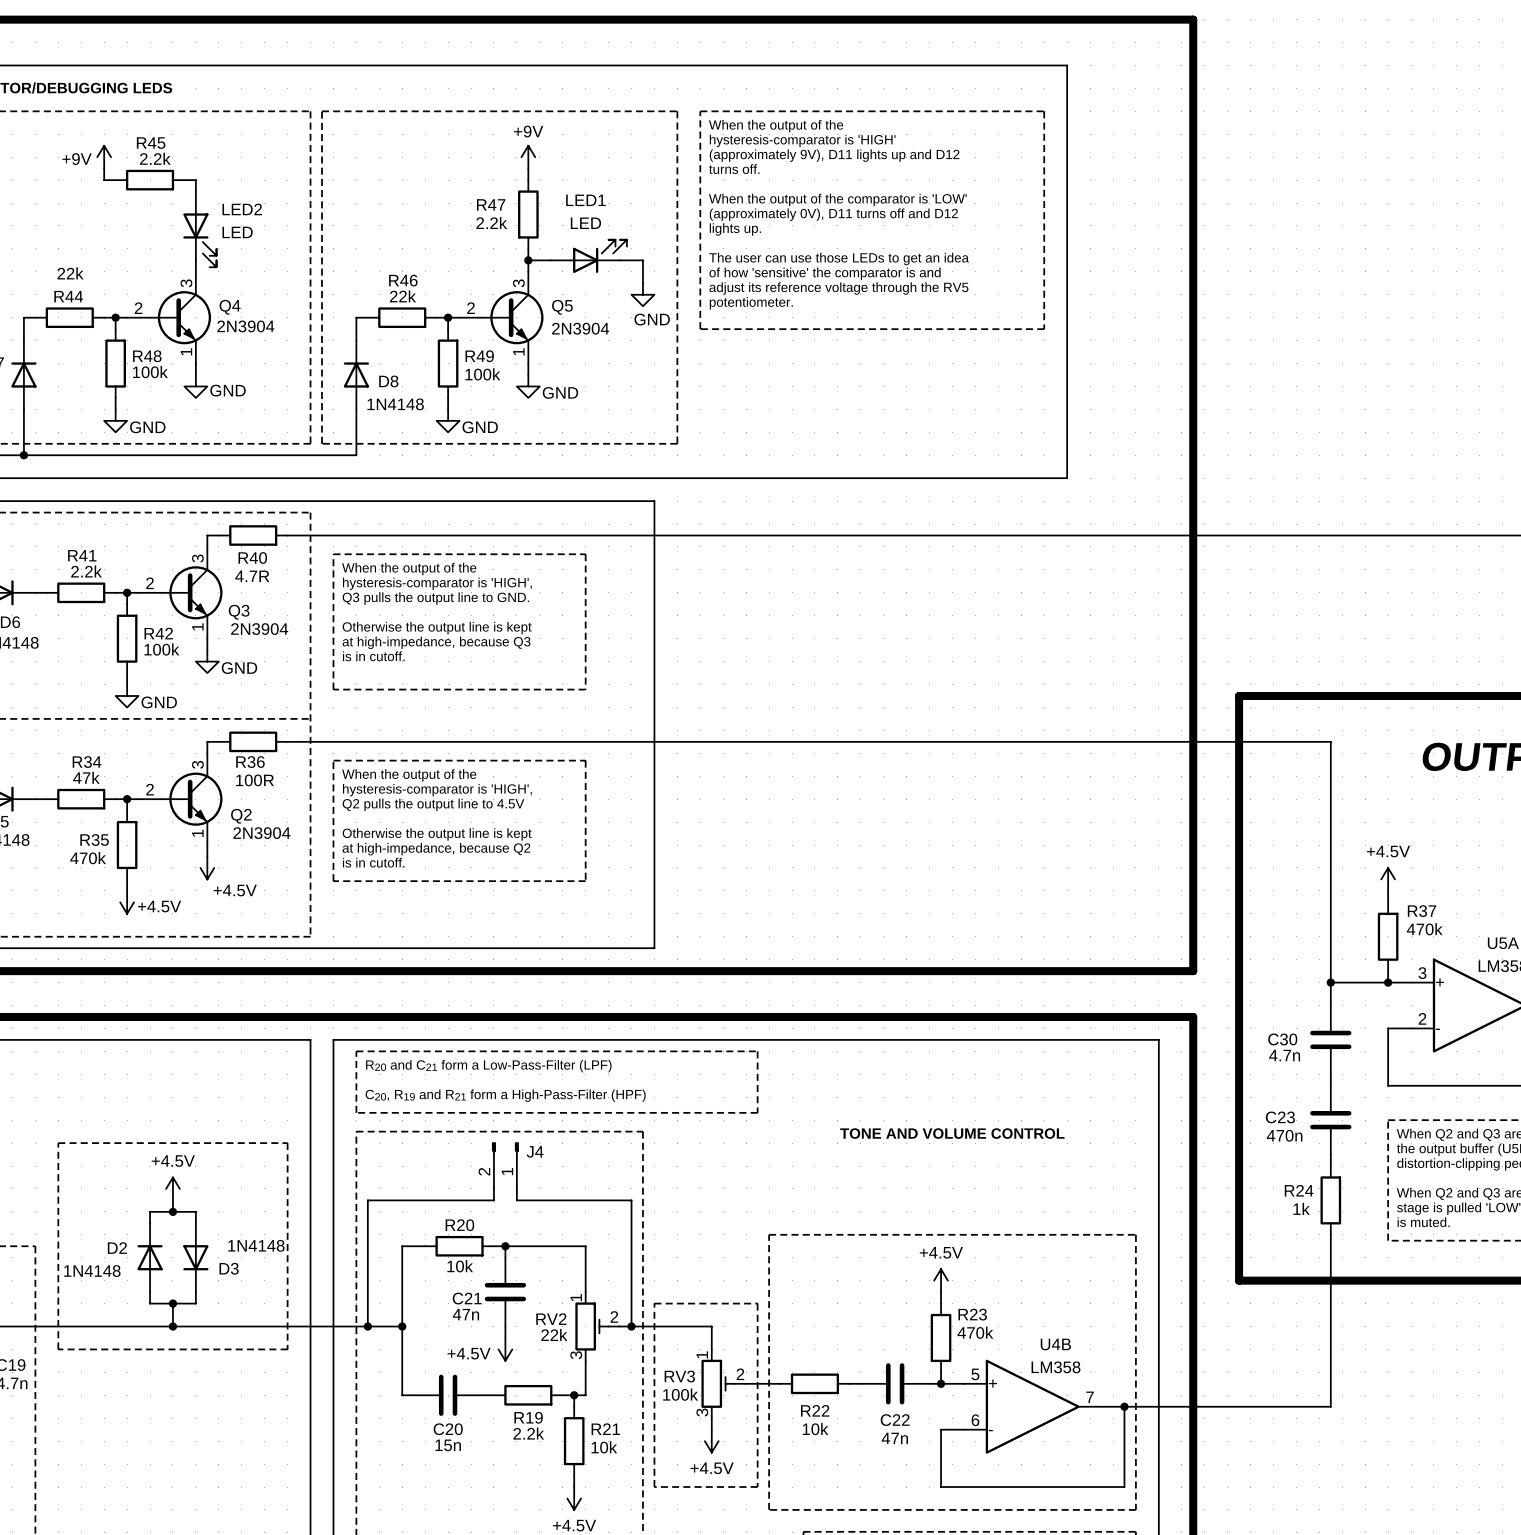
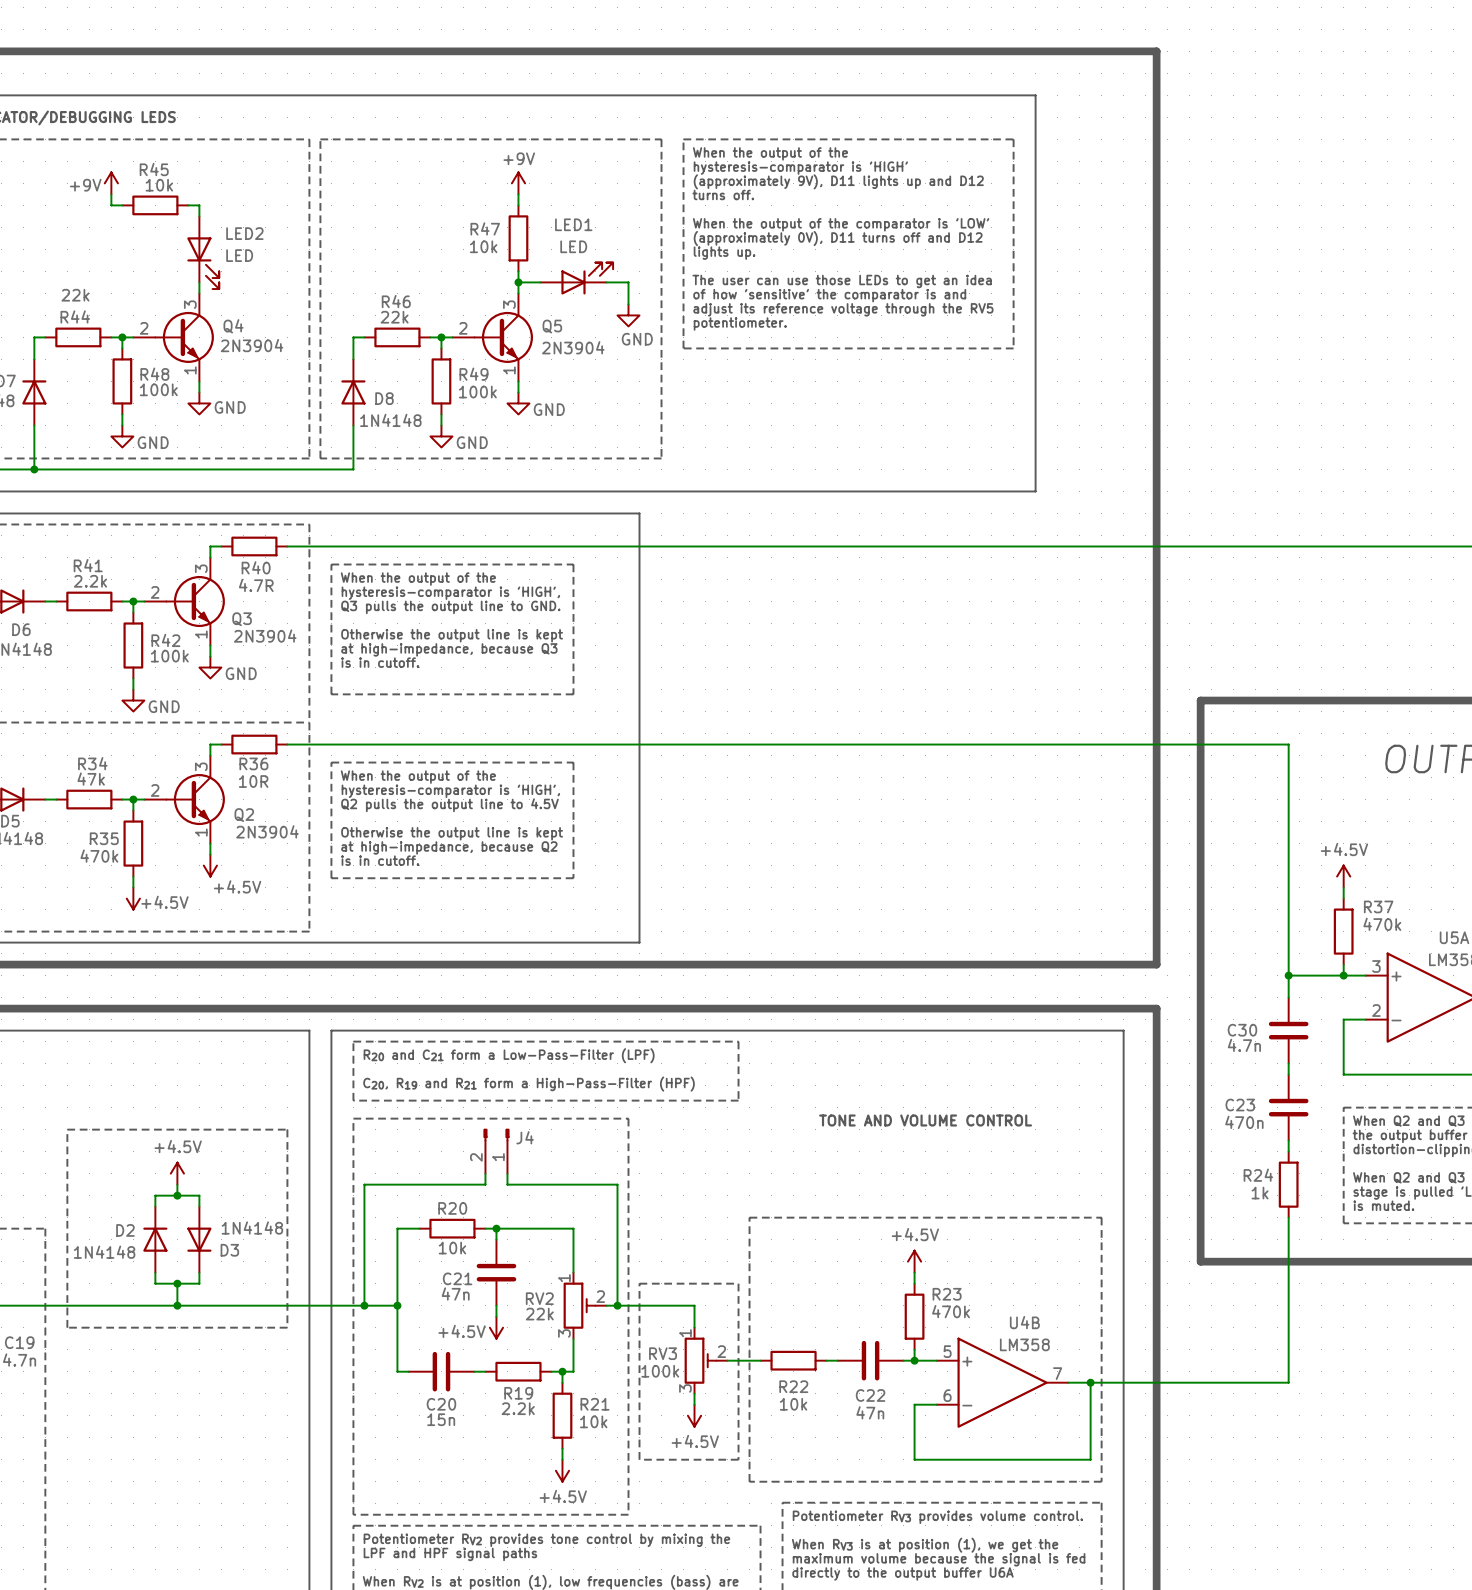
R45 value: 2.2k (155, 158) -> 10k (159, 185)
R47 value: 2.2k (491, 222) -> 10k (483, 246)
R36 value: 100R (255, 780) -> 10R (253, 781)

